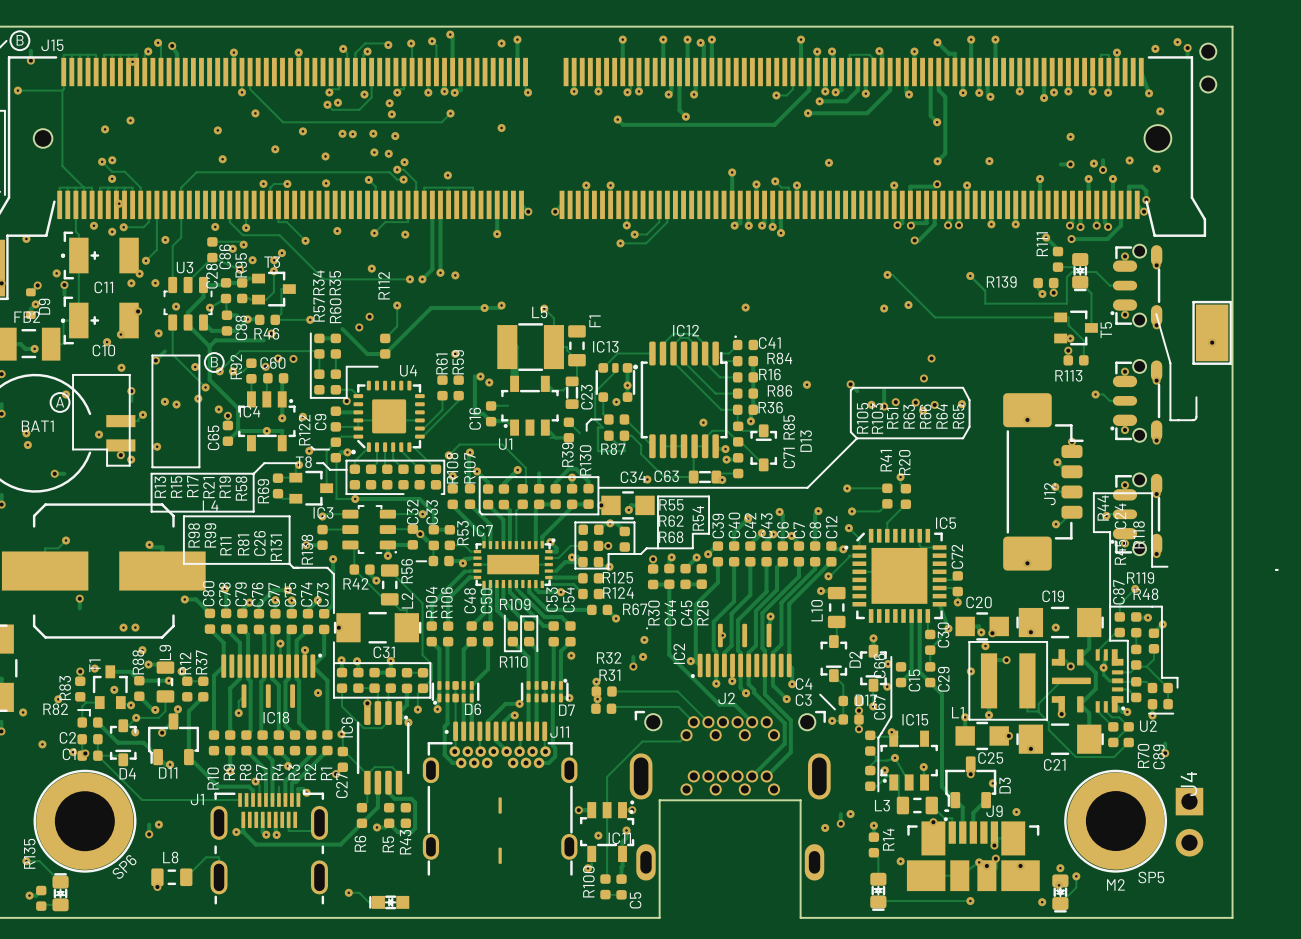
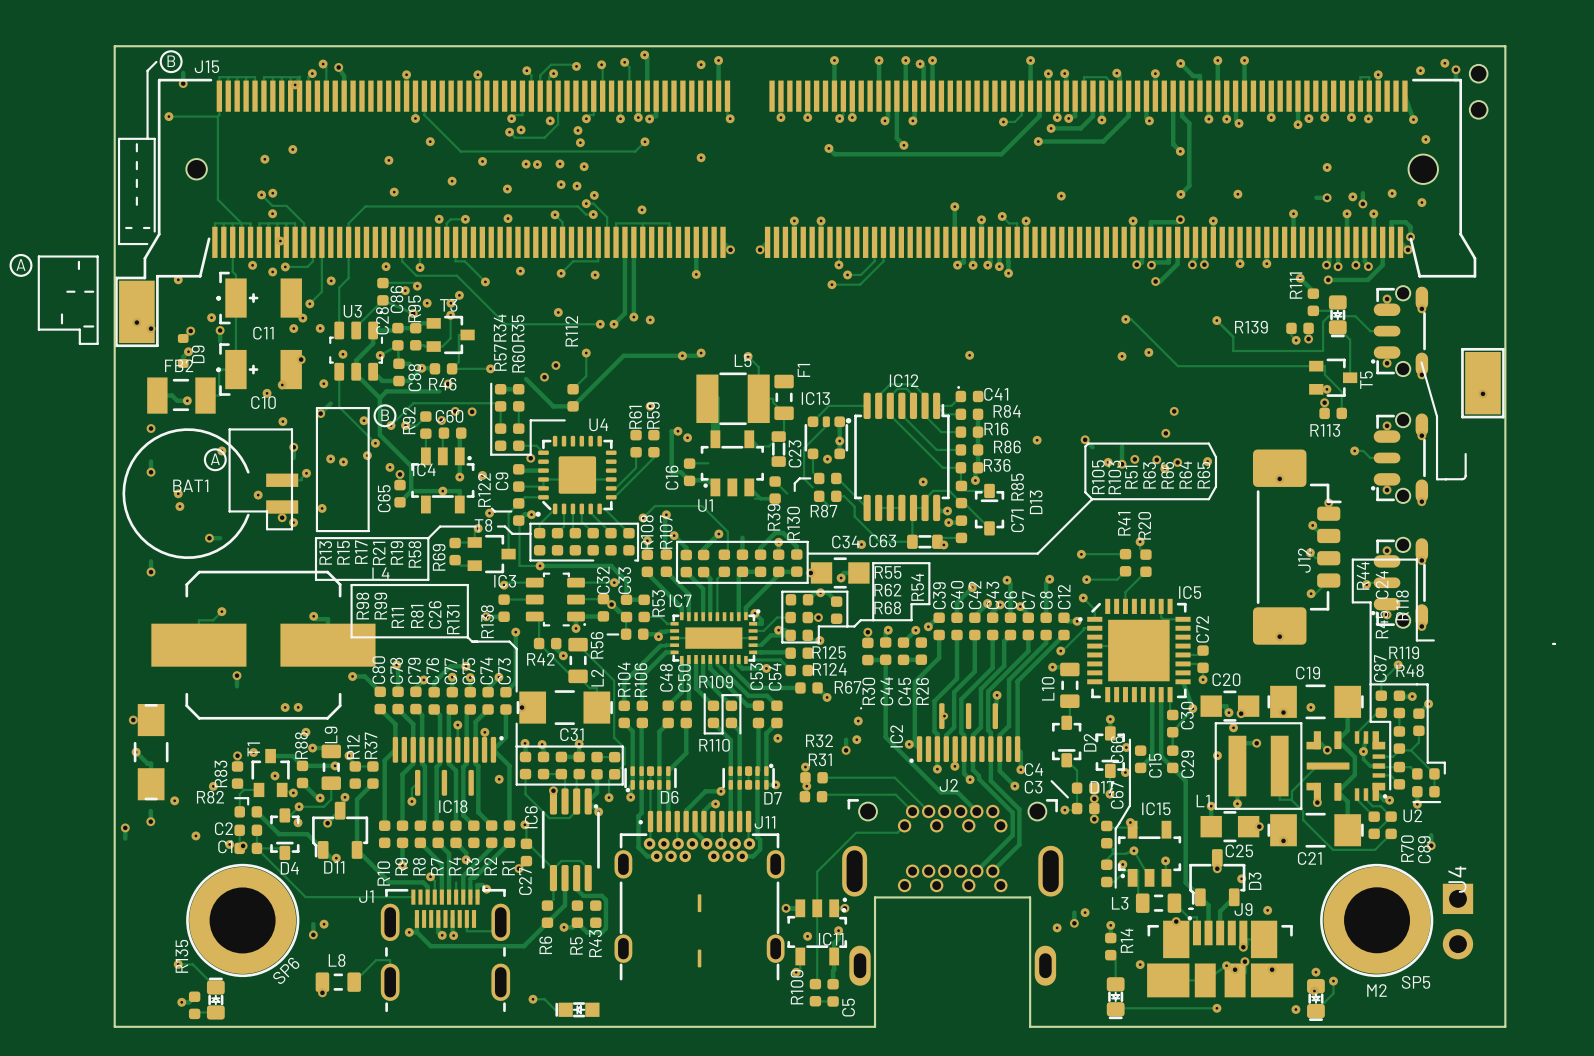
track: (602, 427) (598, 427) (598, 451) (624, 451) (624, 435) -> none

